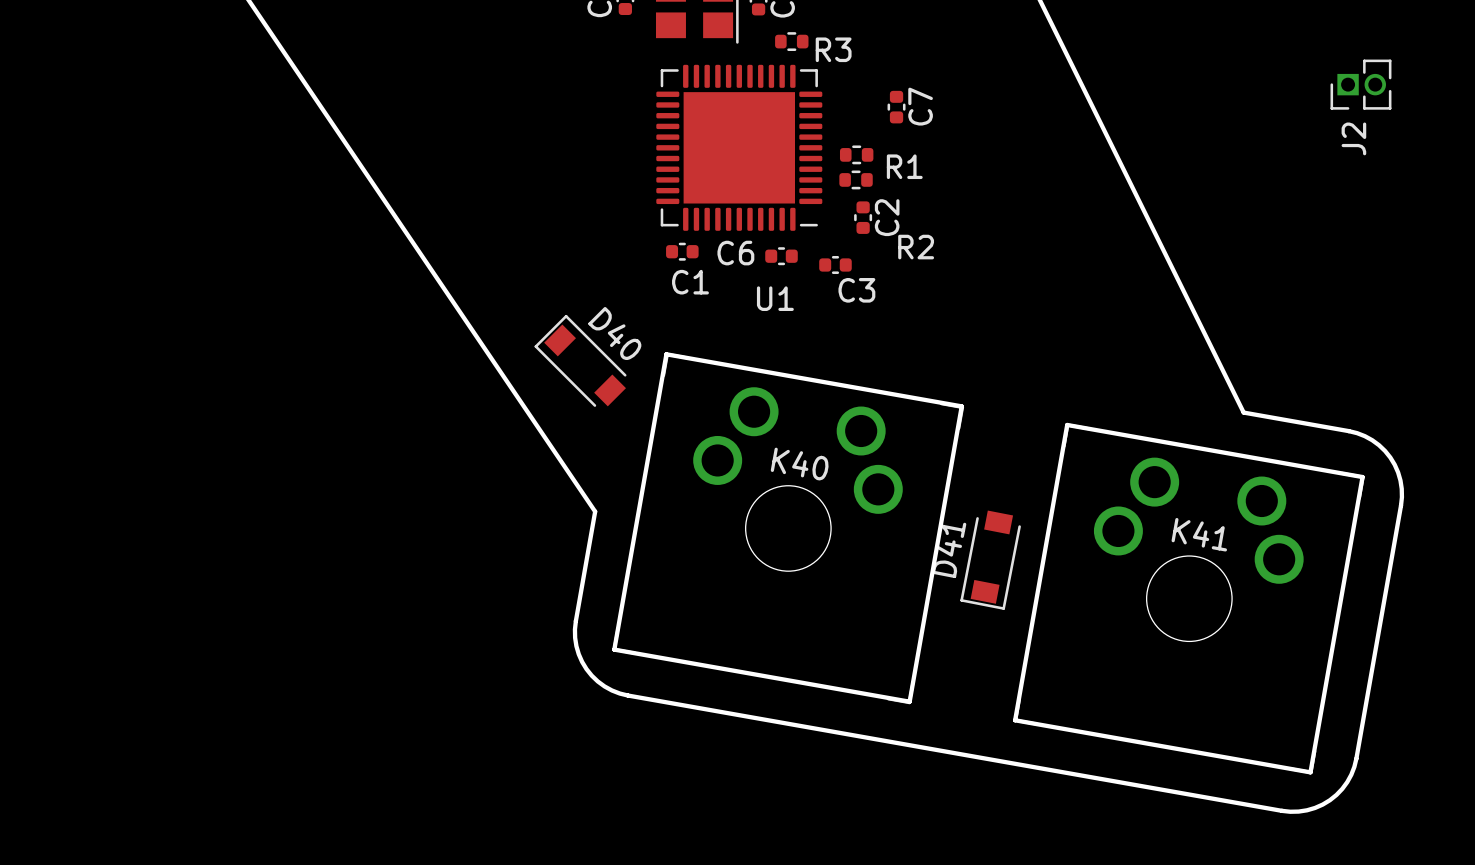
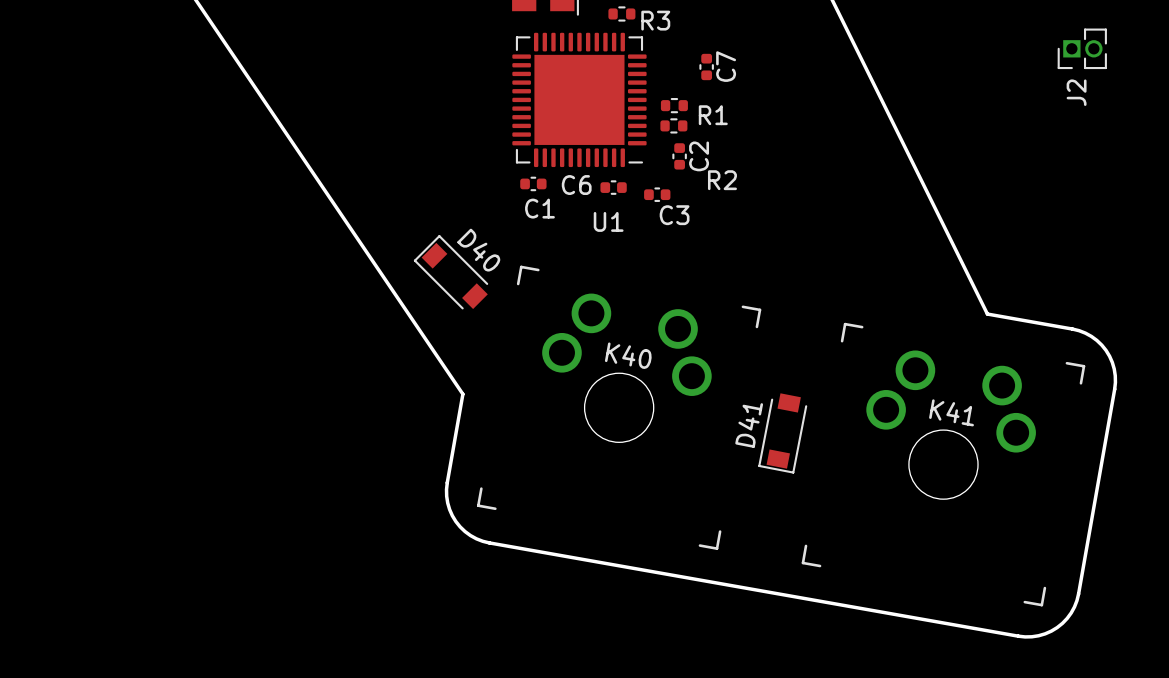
board edge: (666, 354) (614, 649) (909, 701) (961, 406) (666, 354) -> none
board edge: (1067, 424) (1015, 720) (1310, 772) (1362, 477) (1067, 424) -> none

